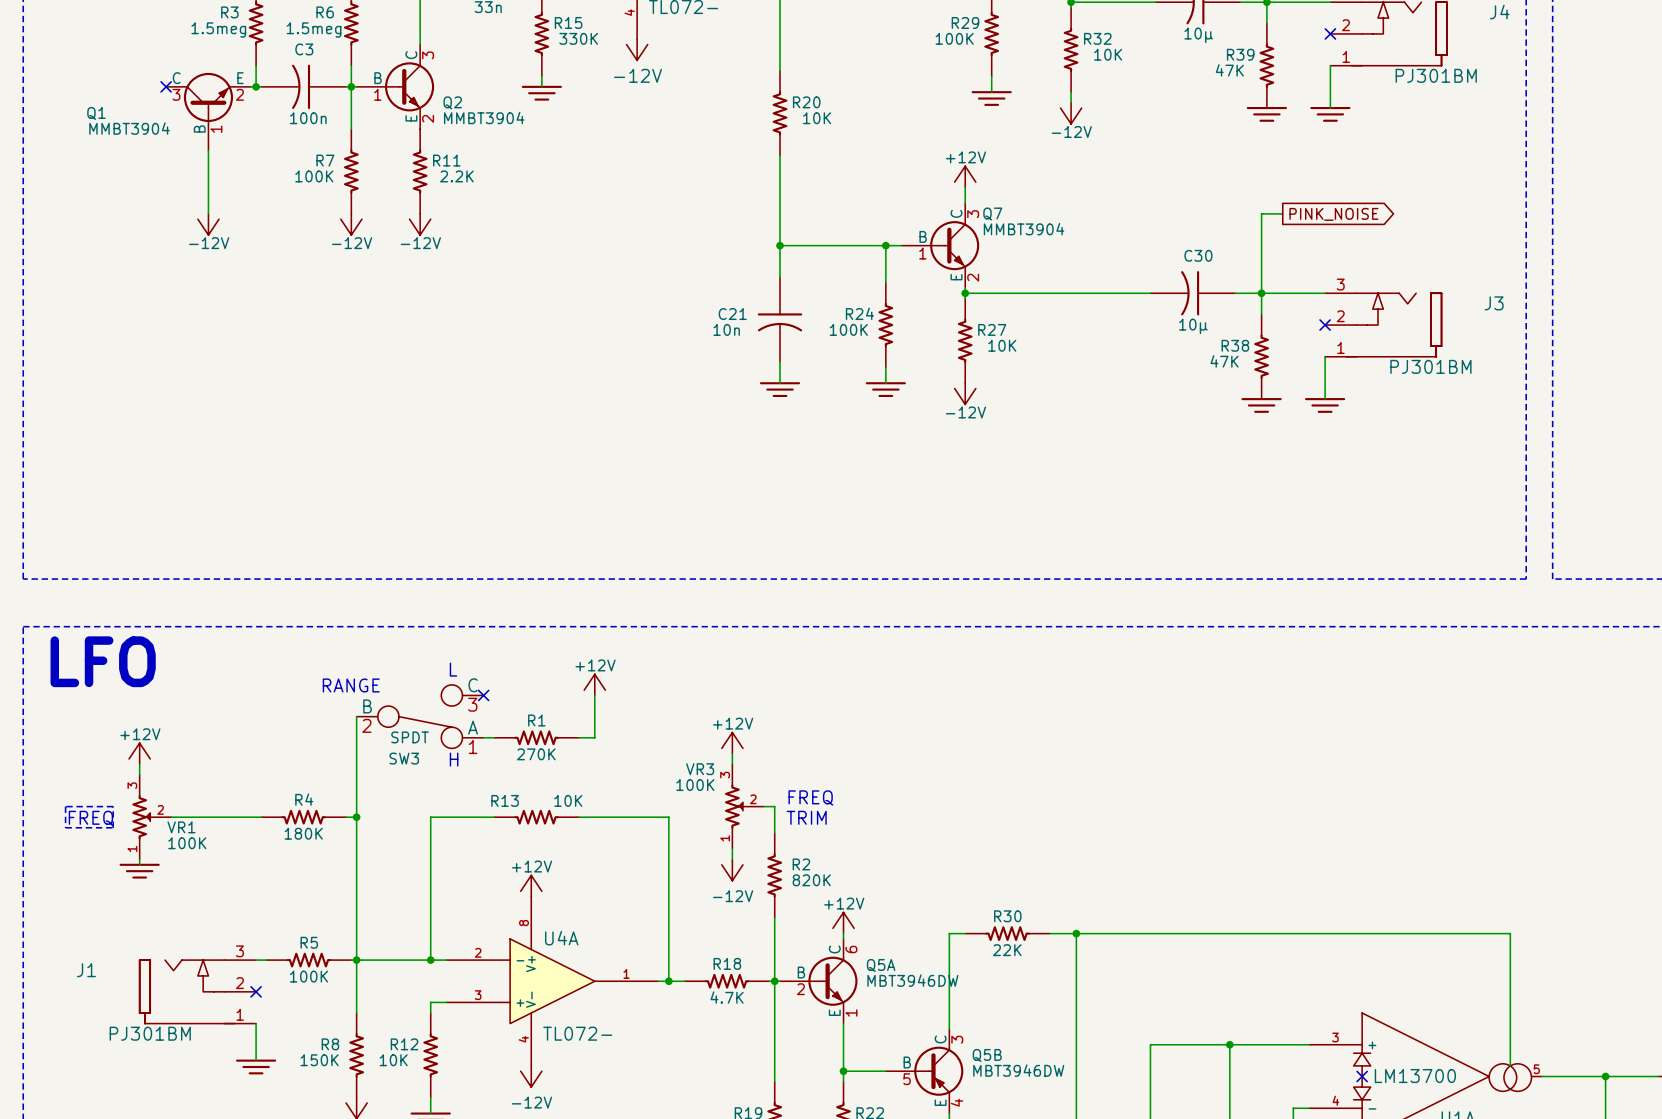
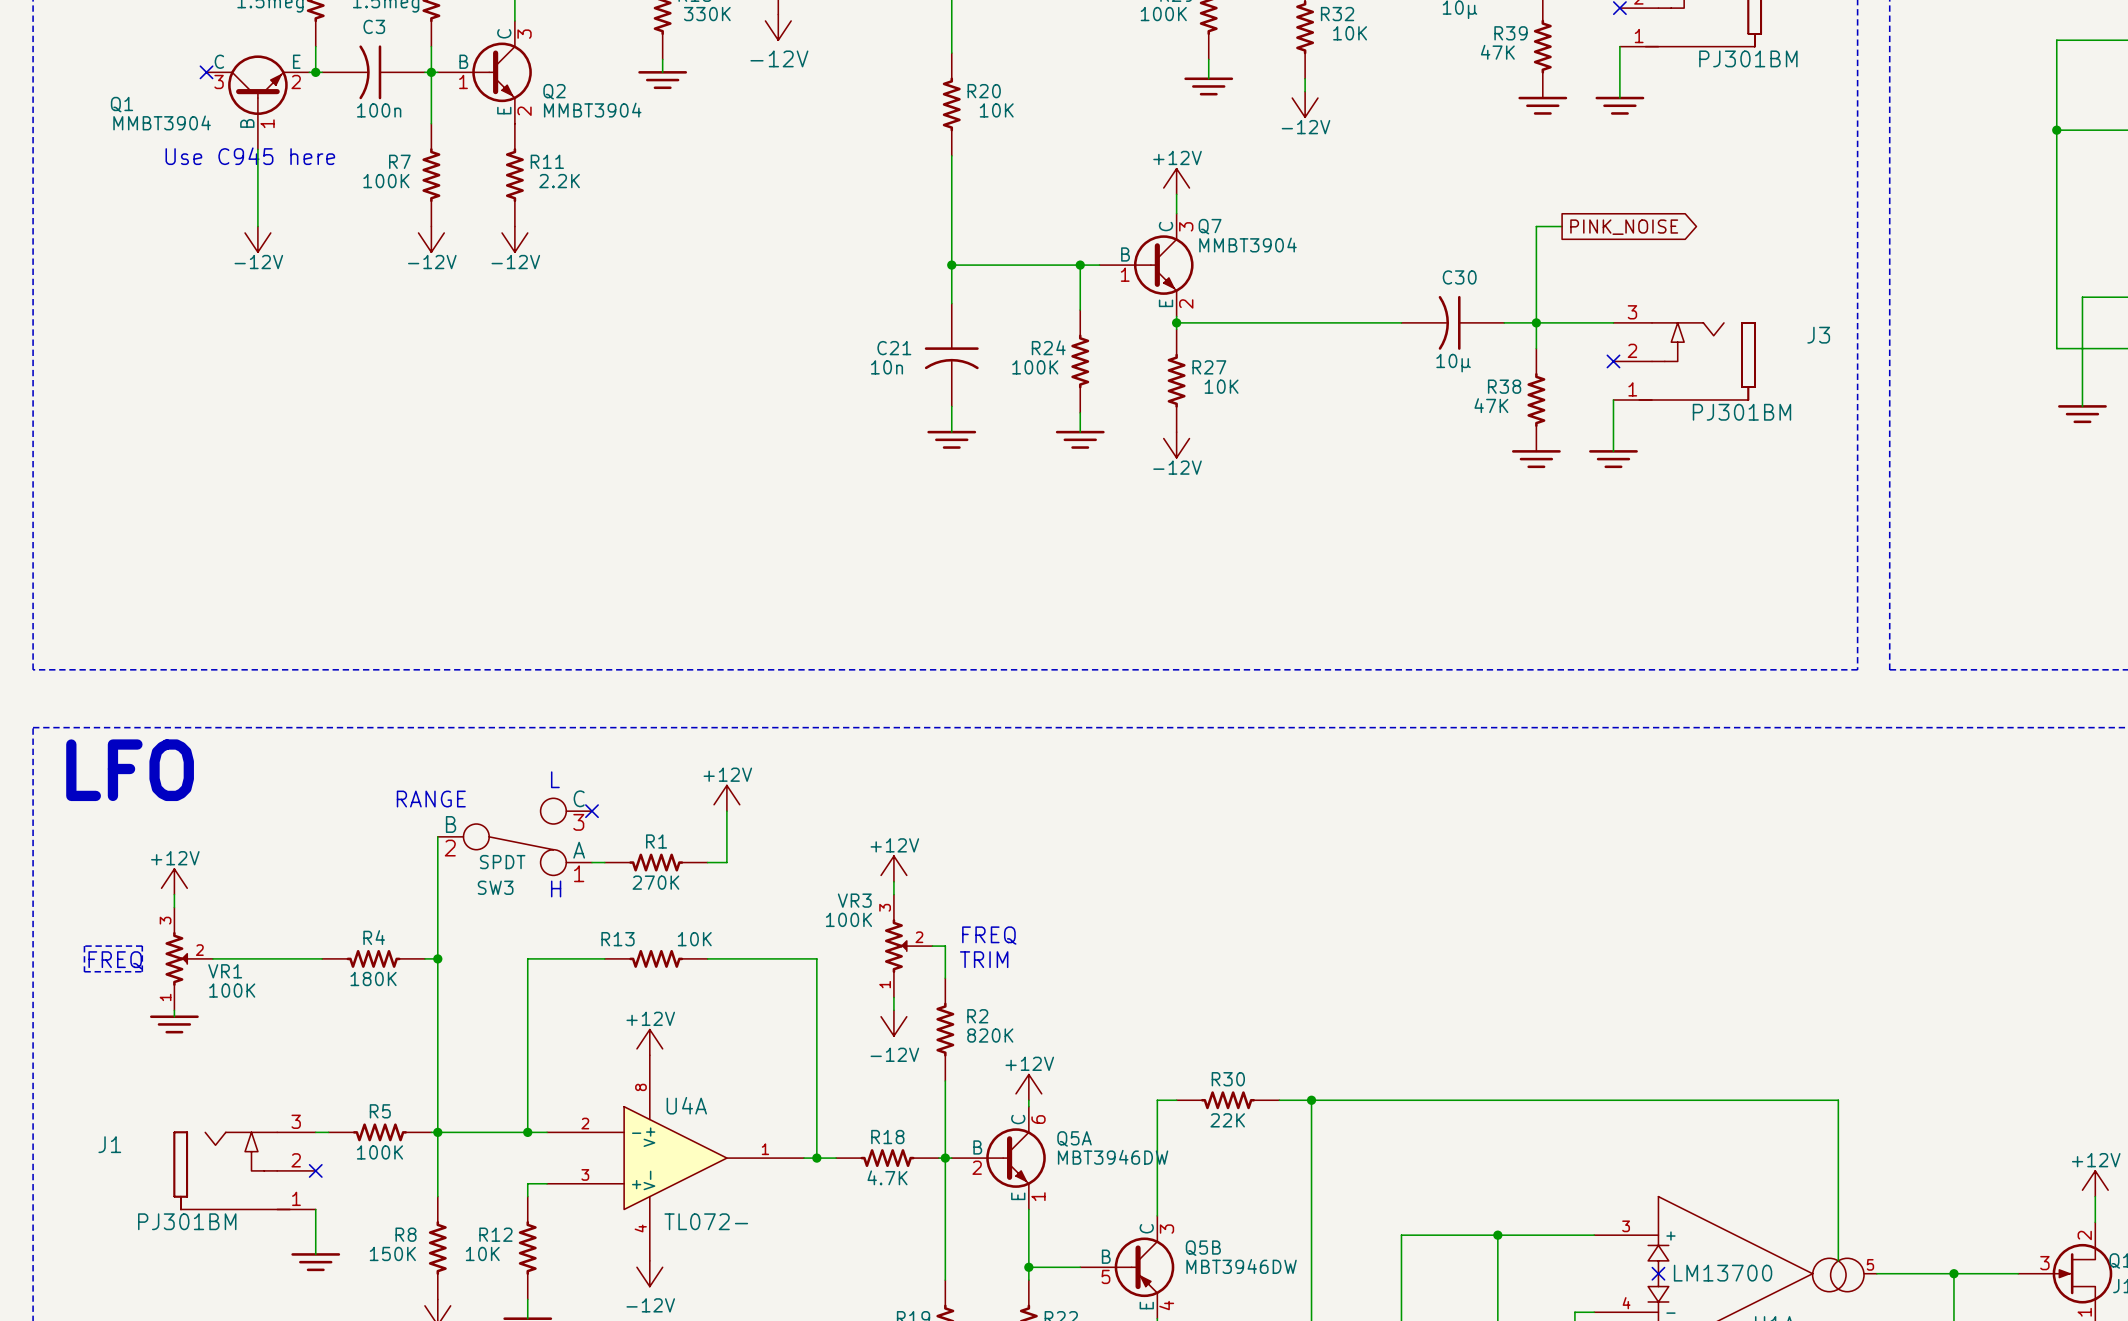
text: none -> Use C945 here (250, 156)

